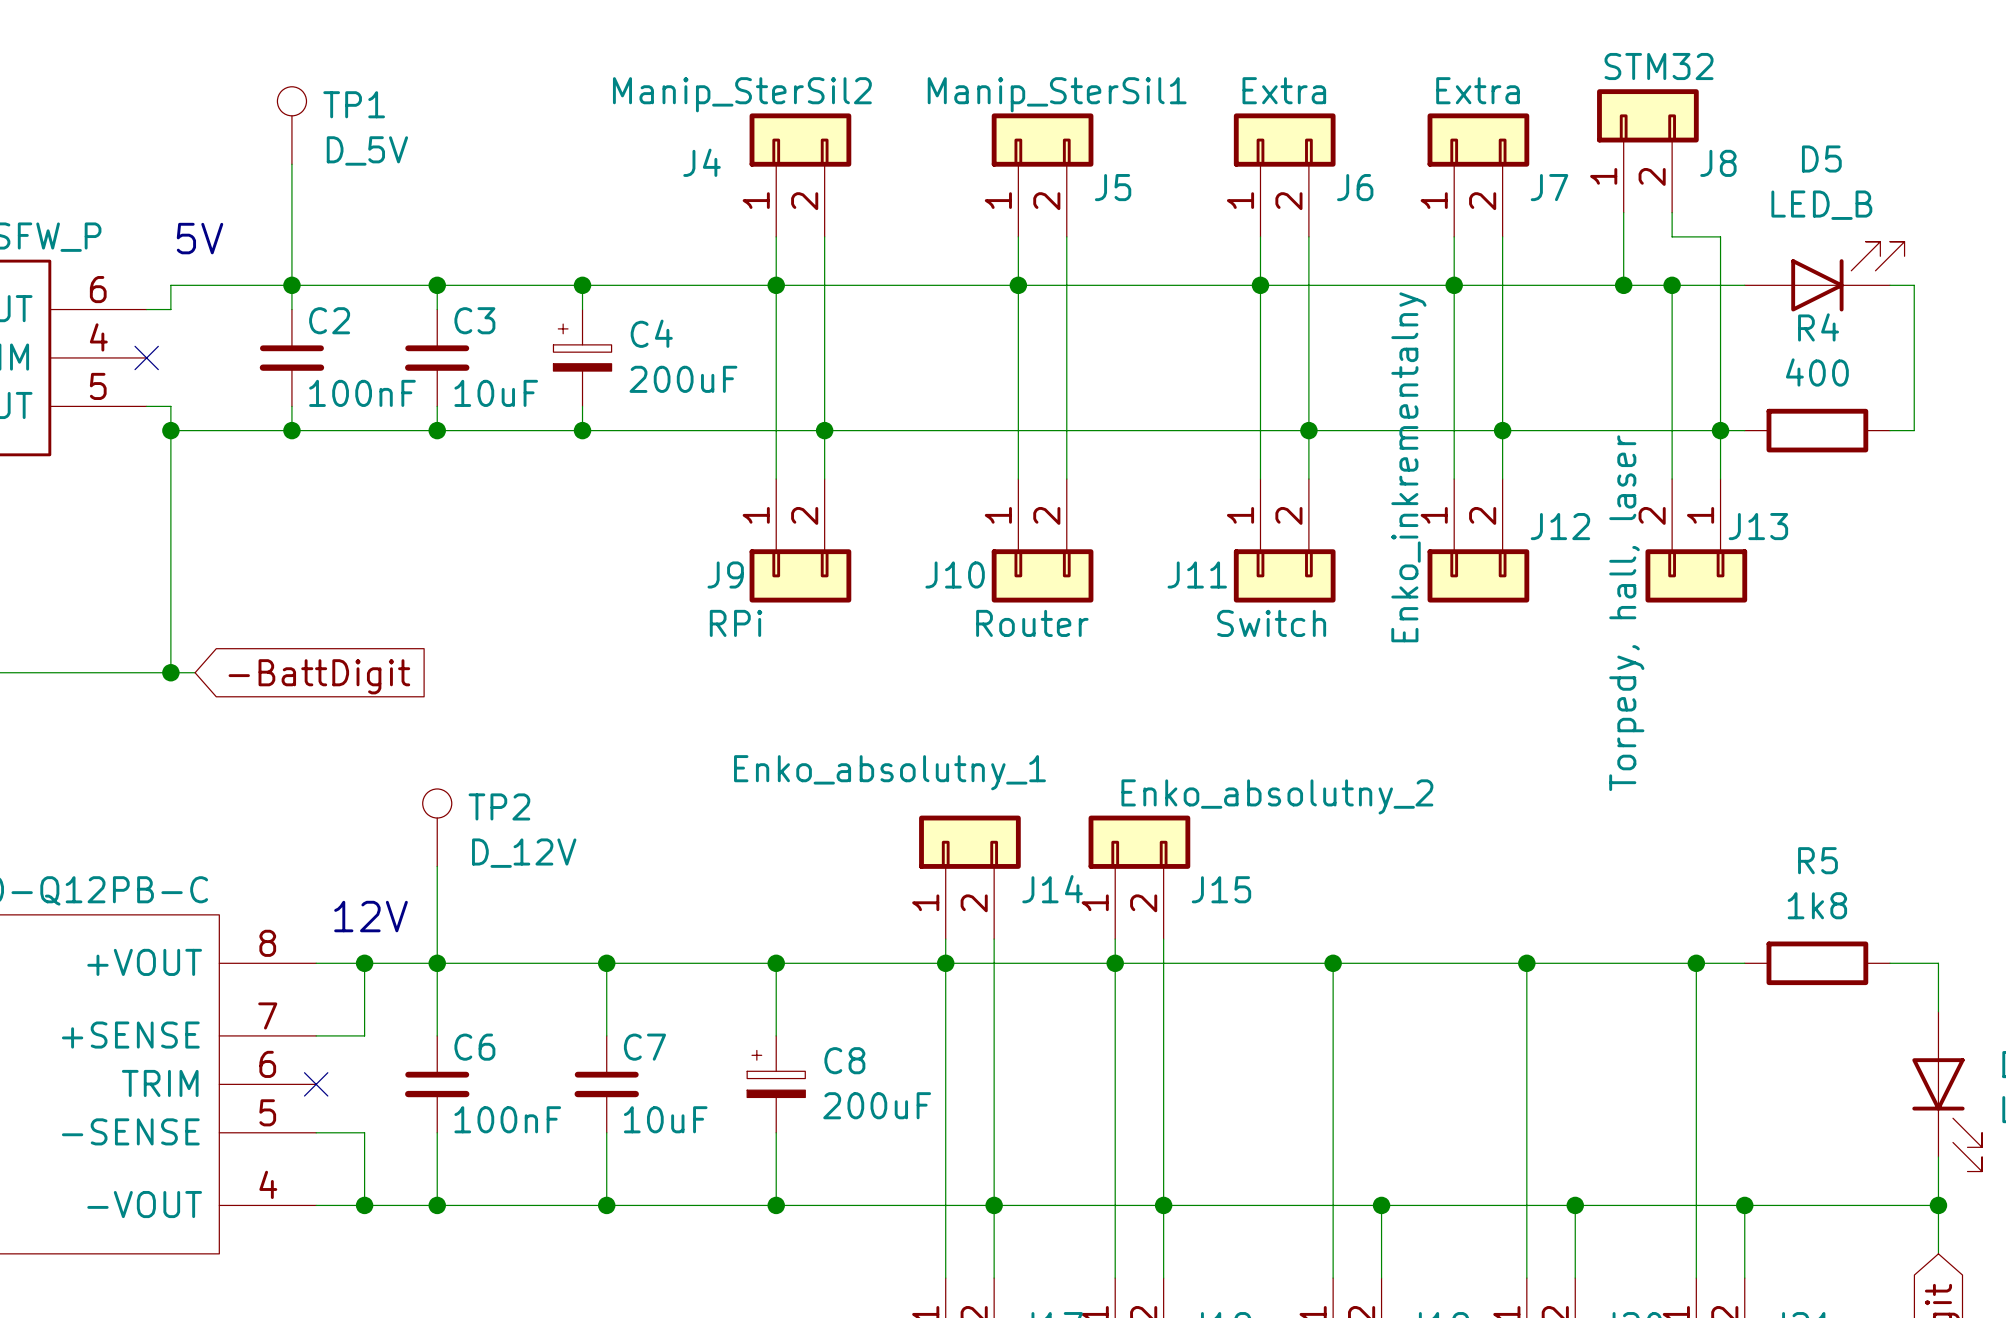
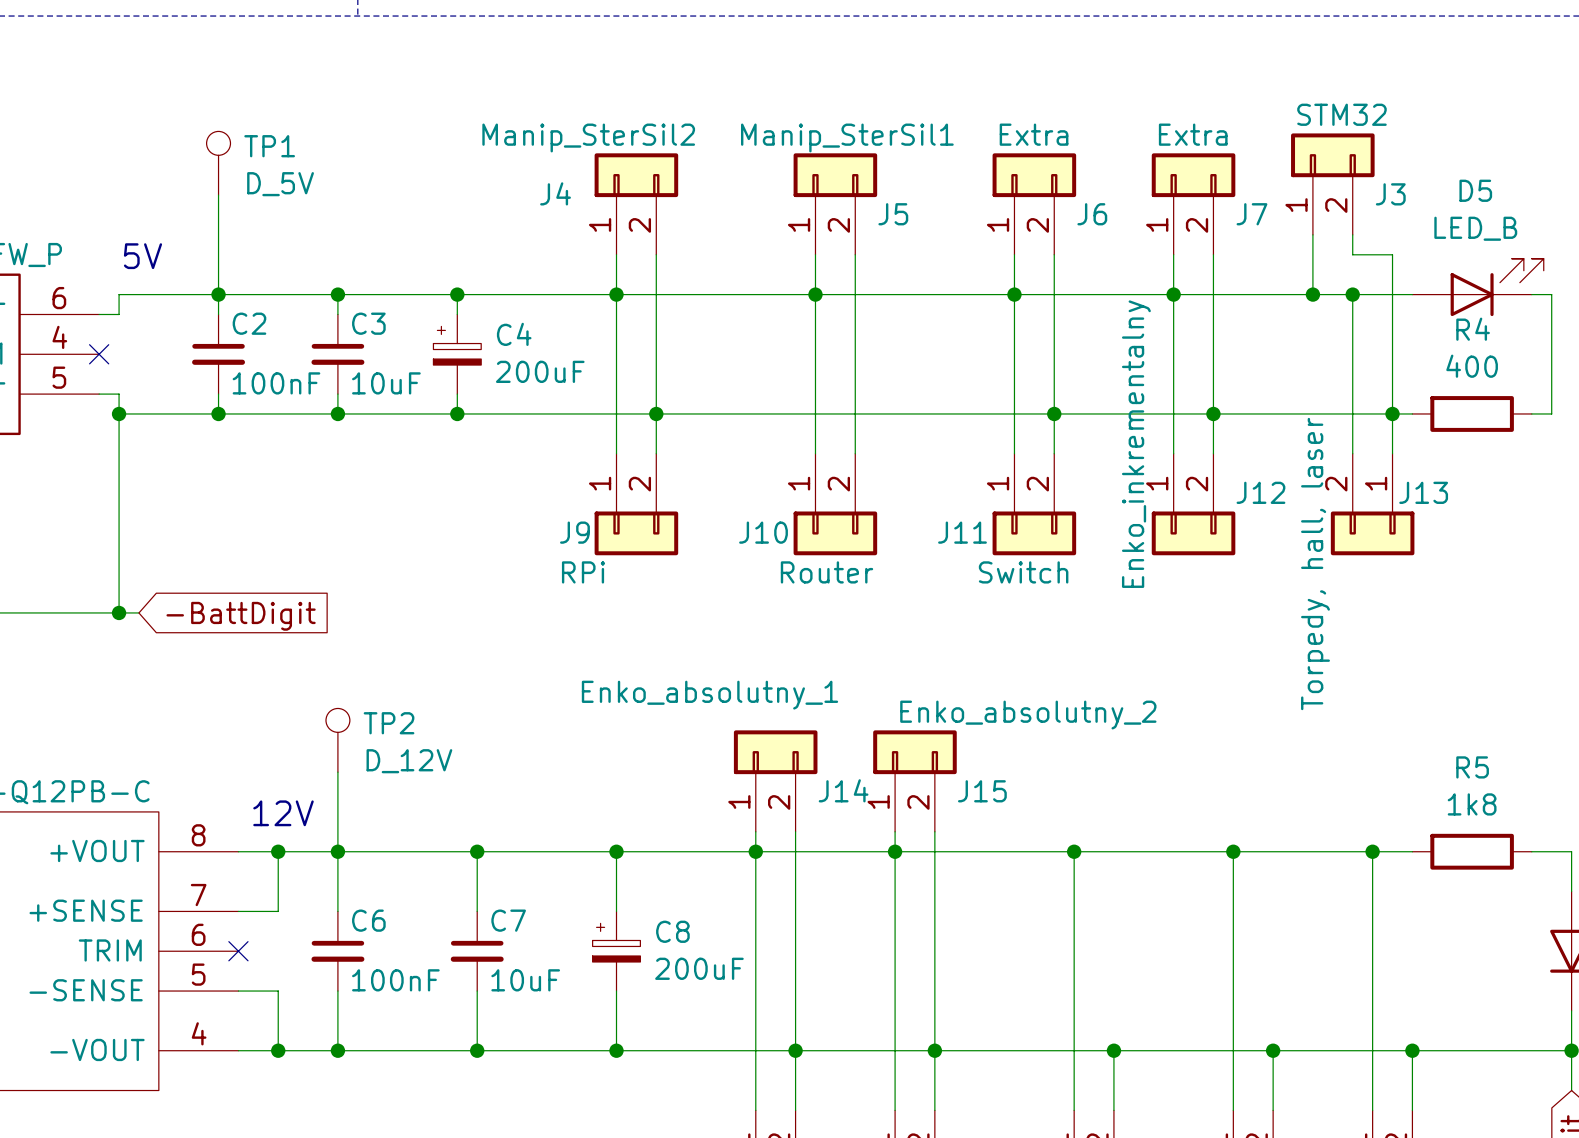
J8 name: J8 (1718, 163) -> J3 (1390, 194)

